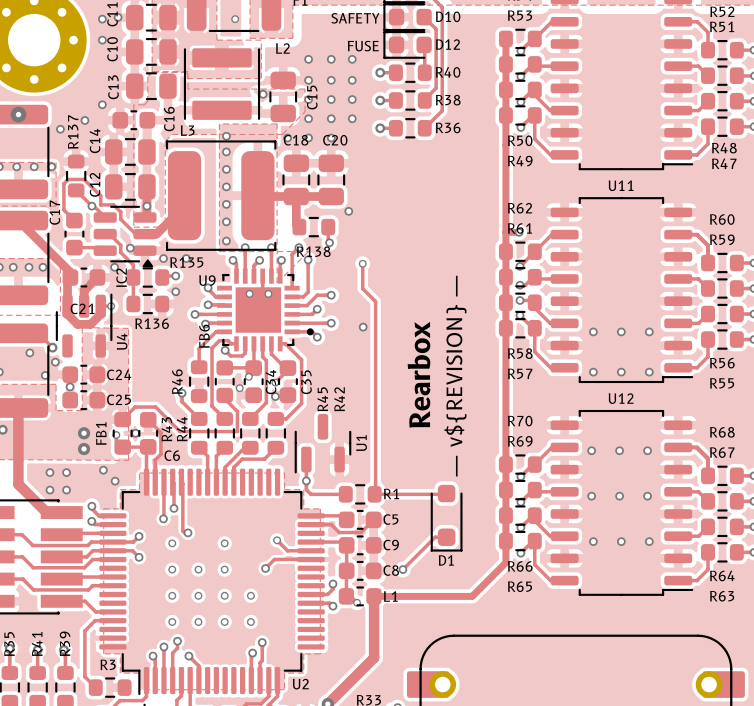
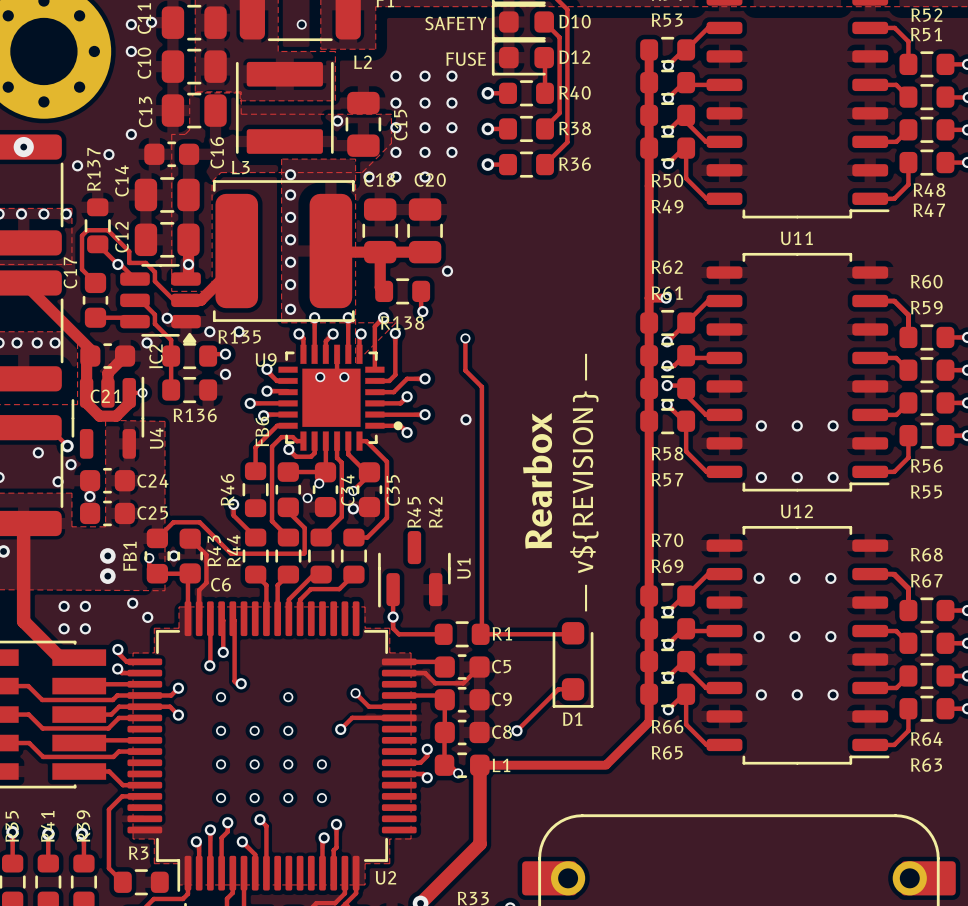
track: none -> (259, 819) (266, 826) (266, 873)
via: none -> (259, 819)

